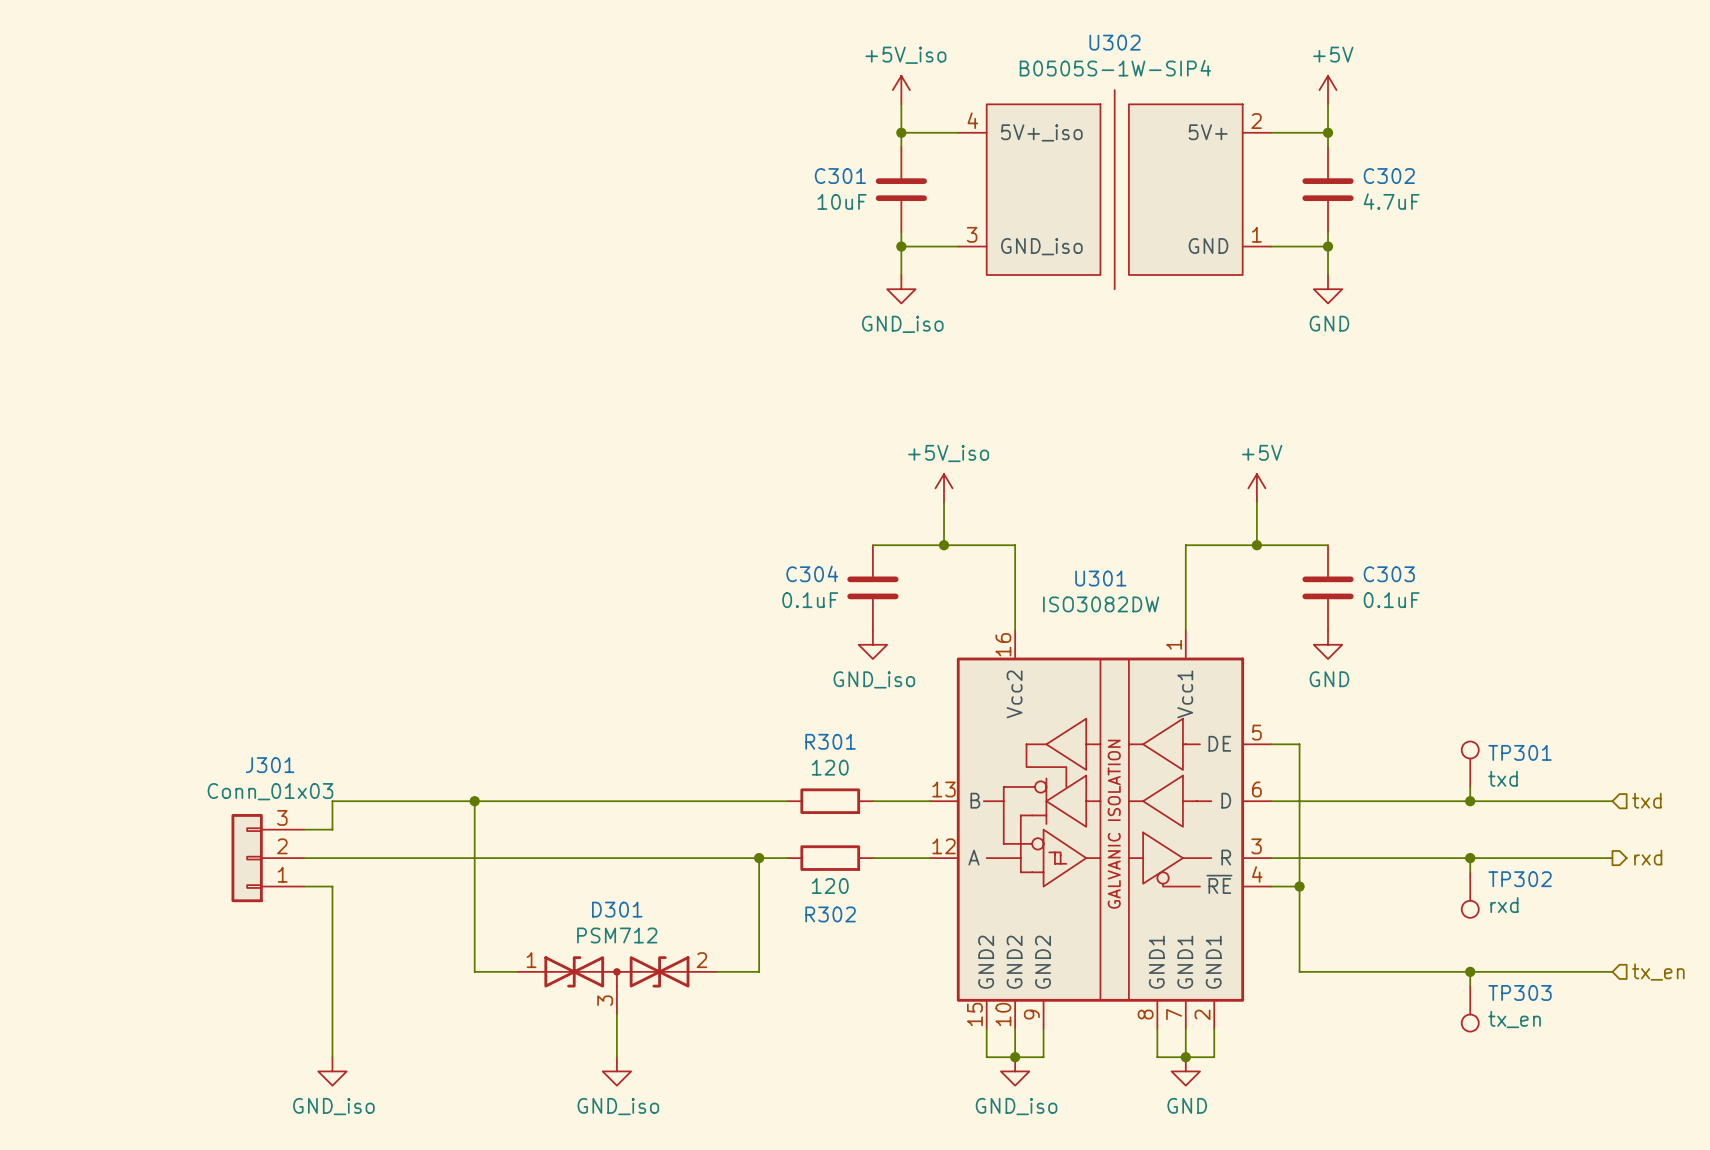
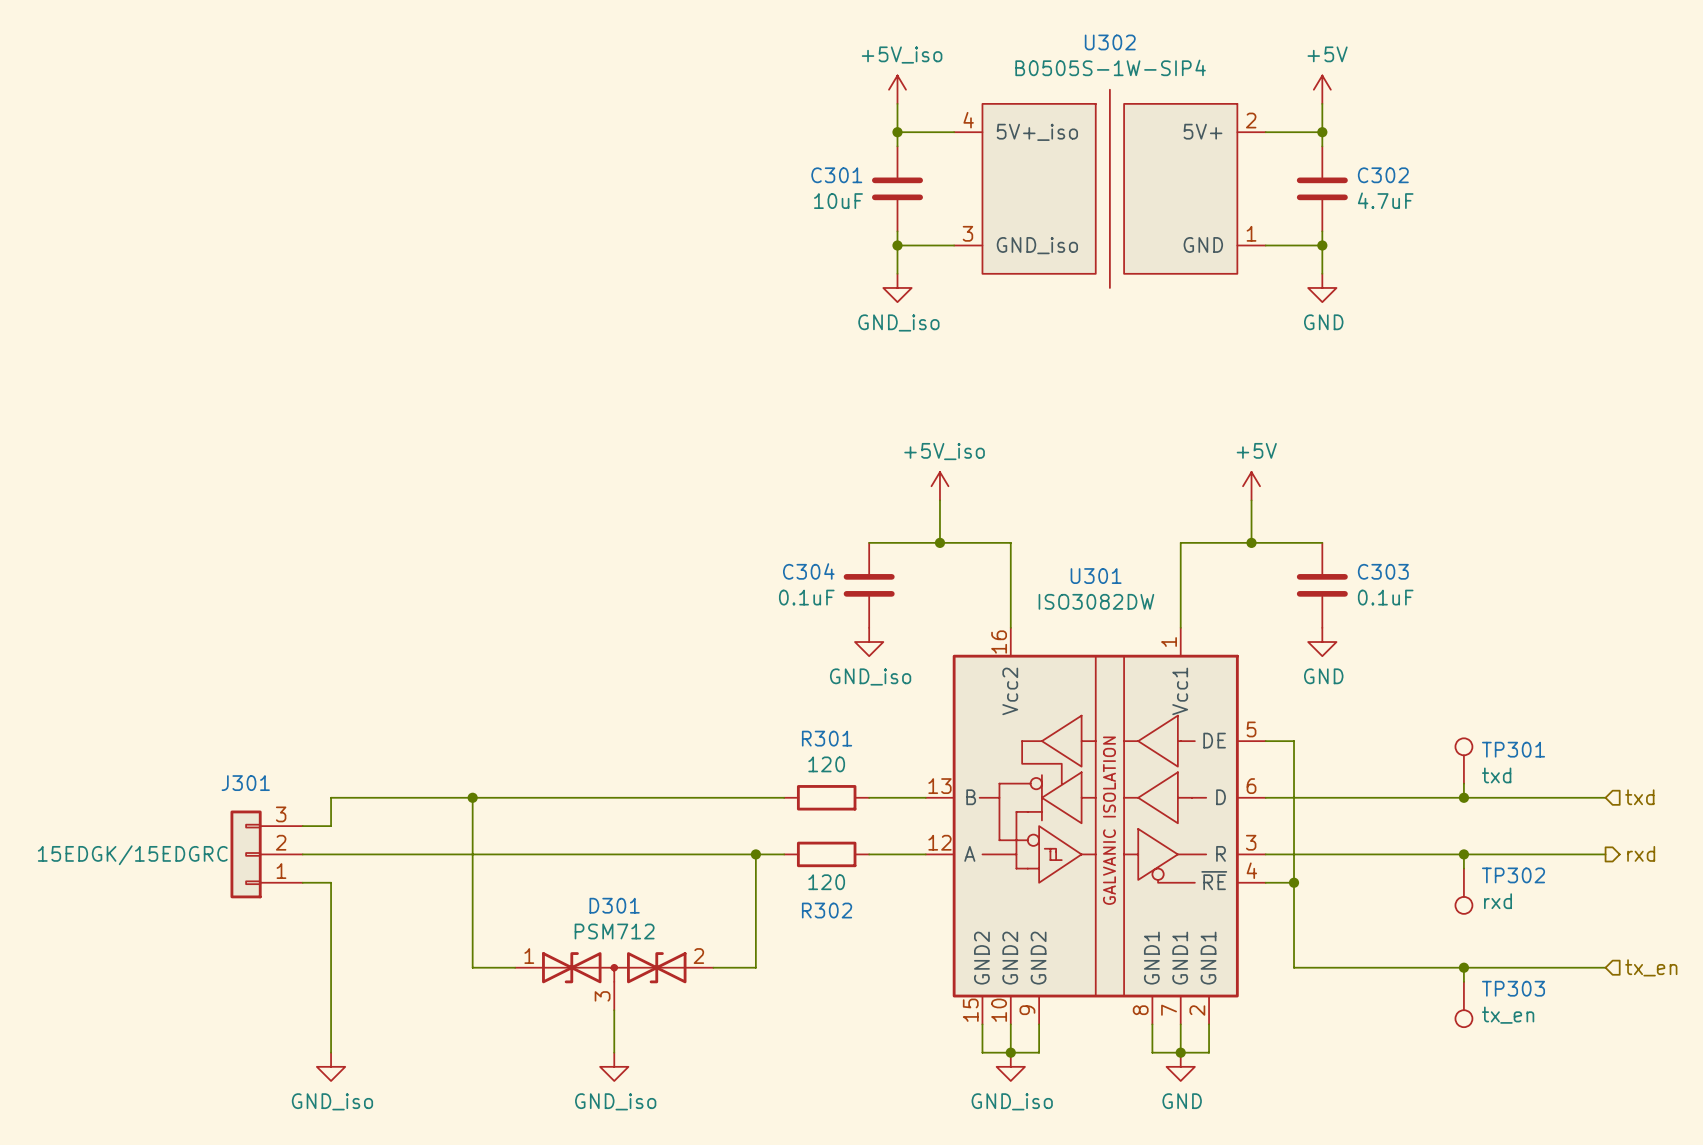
J301 name position: J301 (270, 765) -> J301 (245, 783)
J301 value: Conn_01x03 (270, 791) -> 15EDGK/15EDGRC (132, 855)

